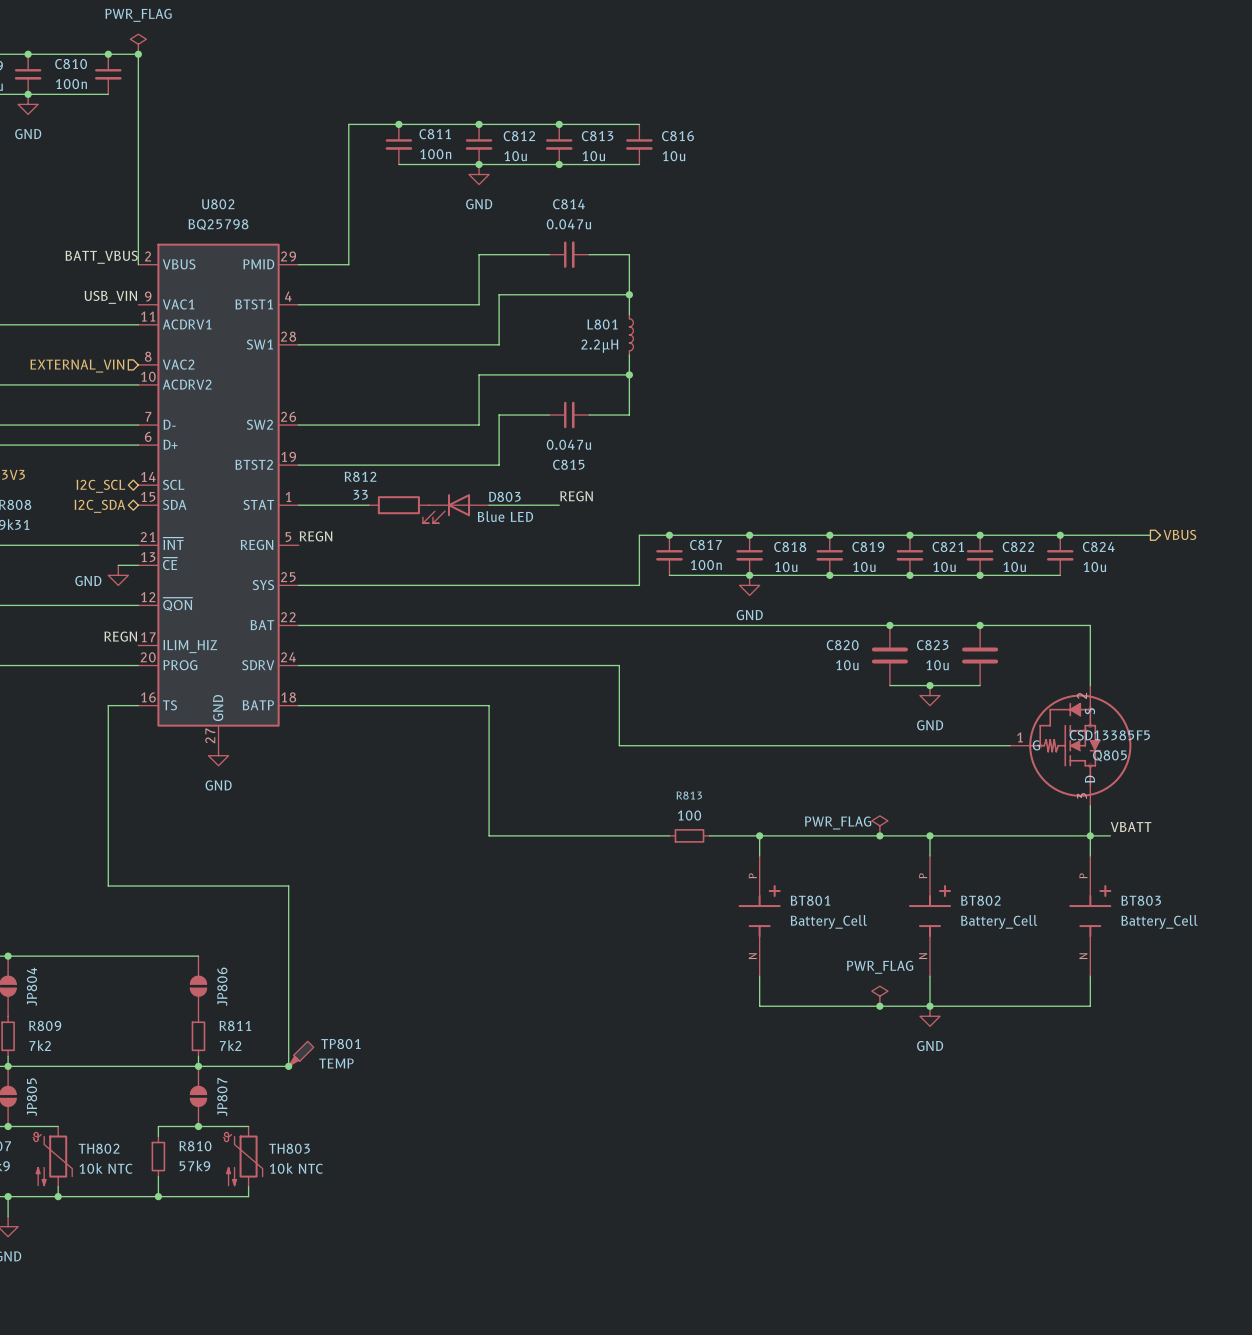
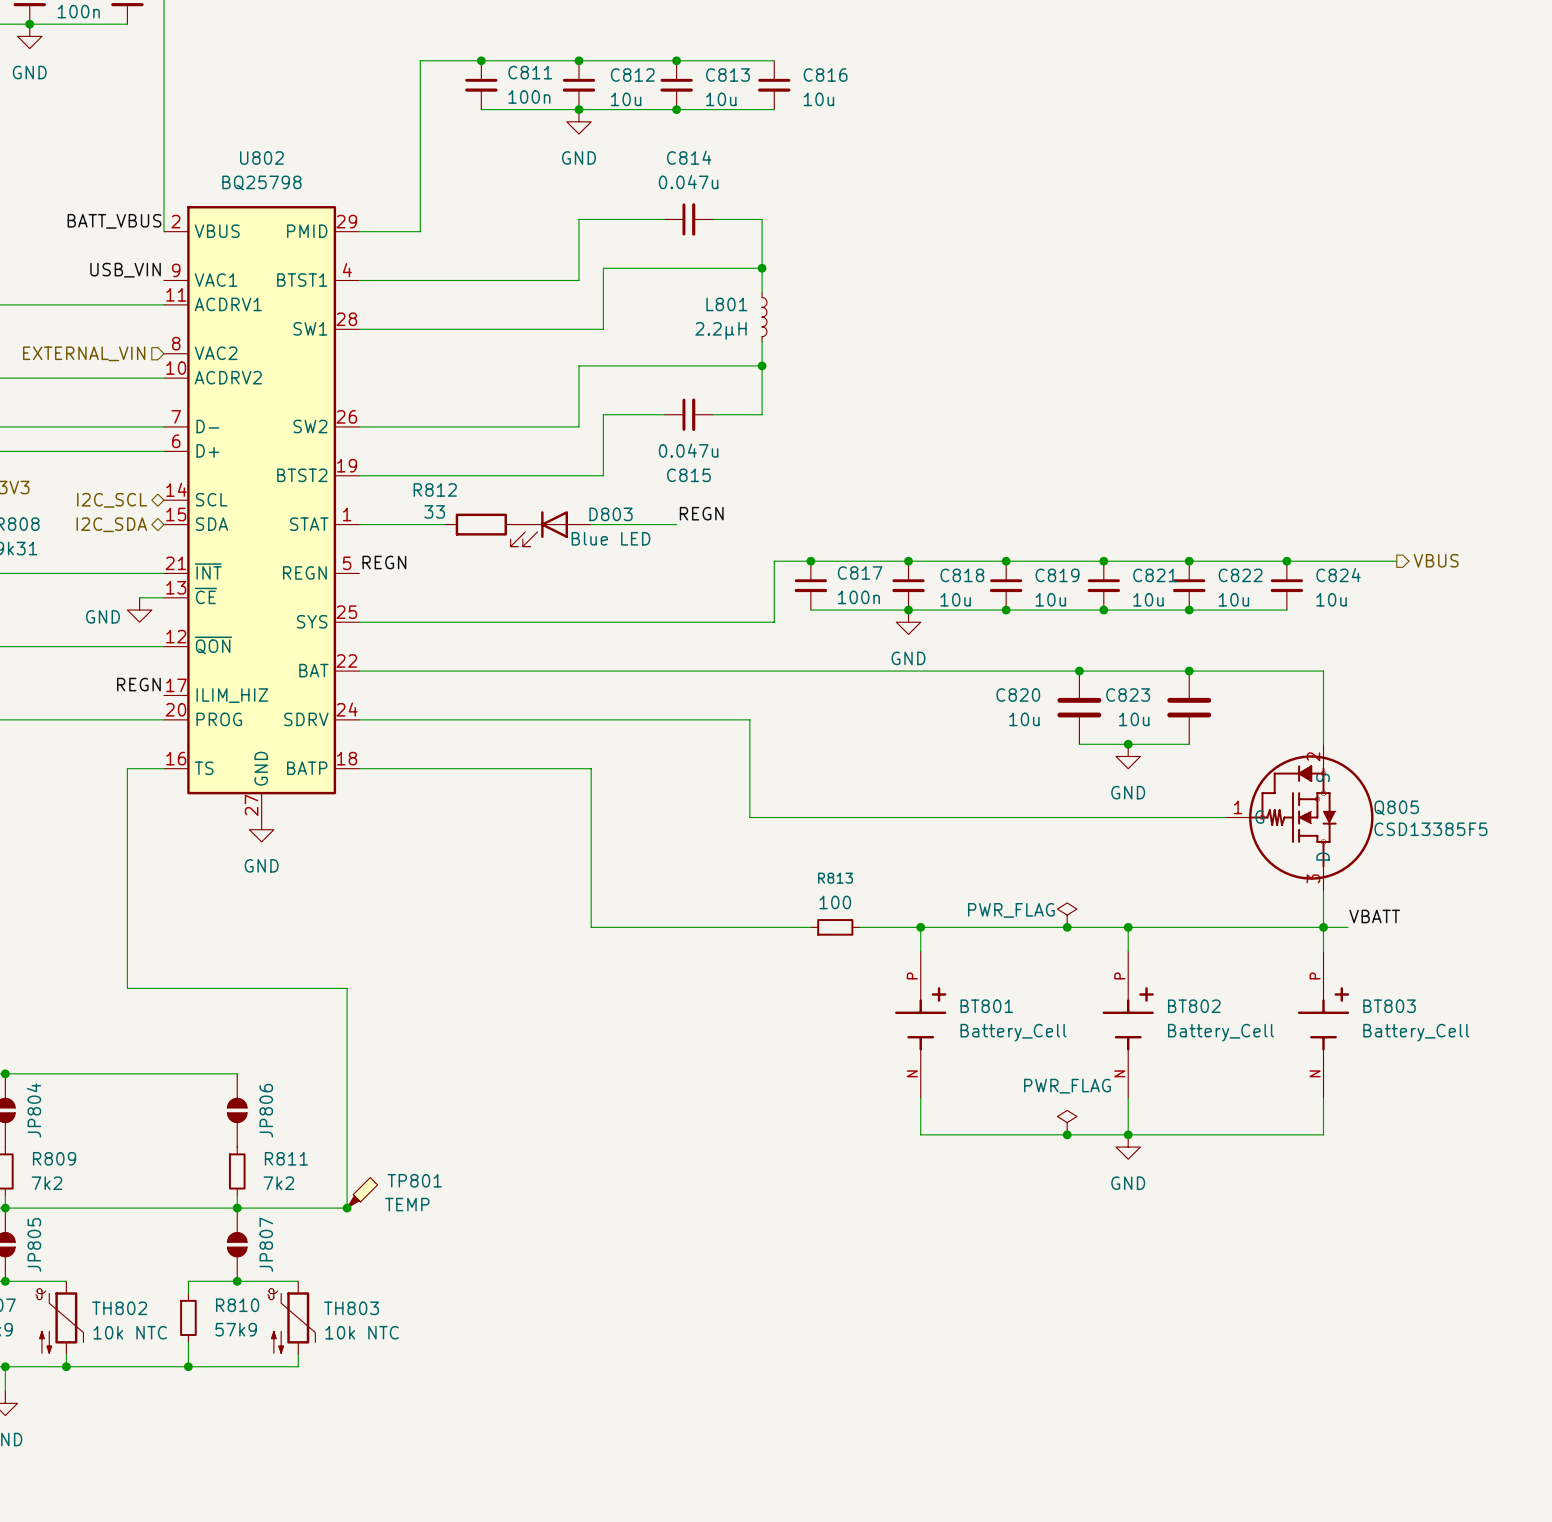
Q805 value position: CSD13385F5 (1109, 735) -> CSD13385F5 (1430, 829)
Q805 name position: Q805 (1109, 755) -> Q805 (1396, 807)

